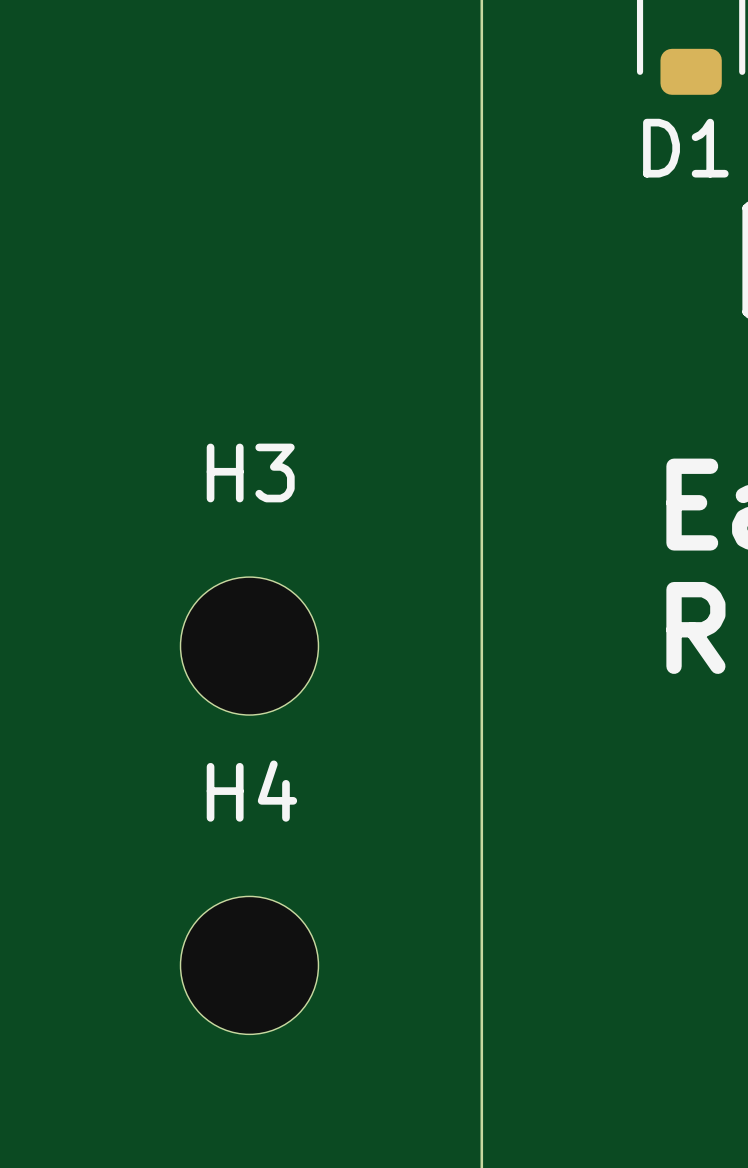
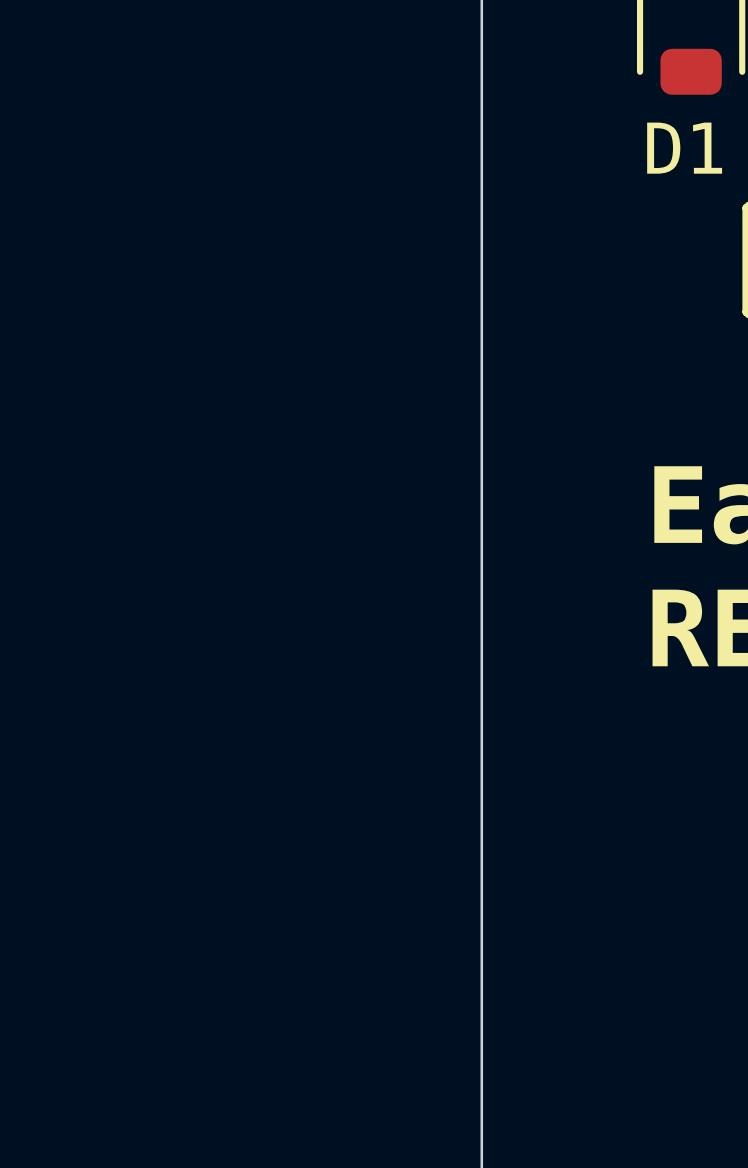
H3: (249, 646) -> none
H4: (249, 965) -> none

